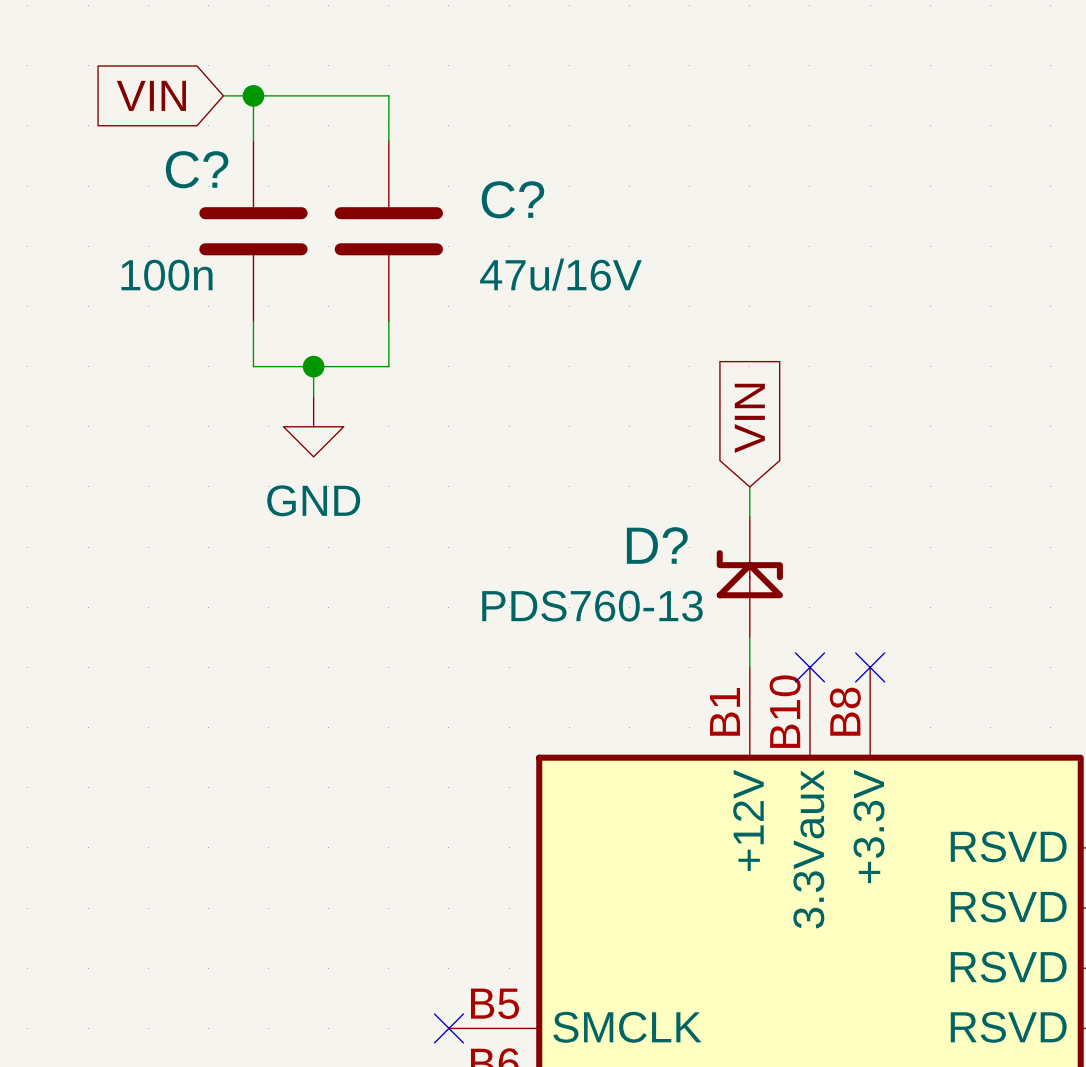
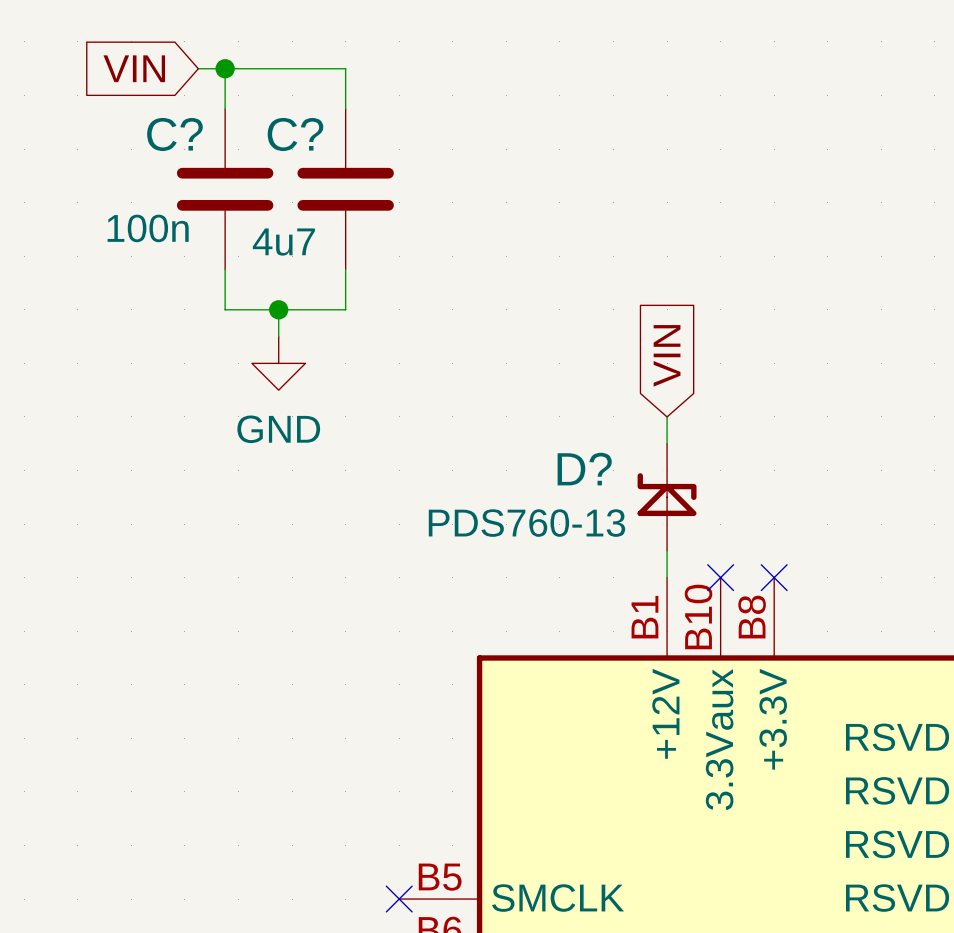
C? name position: C? (512, 199) -> C? (295, 134)
C? text: 47u/16V (560, 274) -> 4u7 (283, 242)

